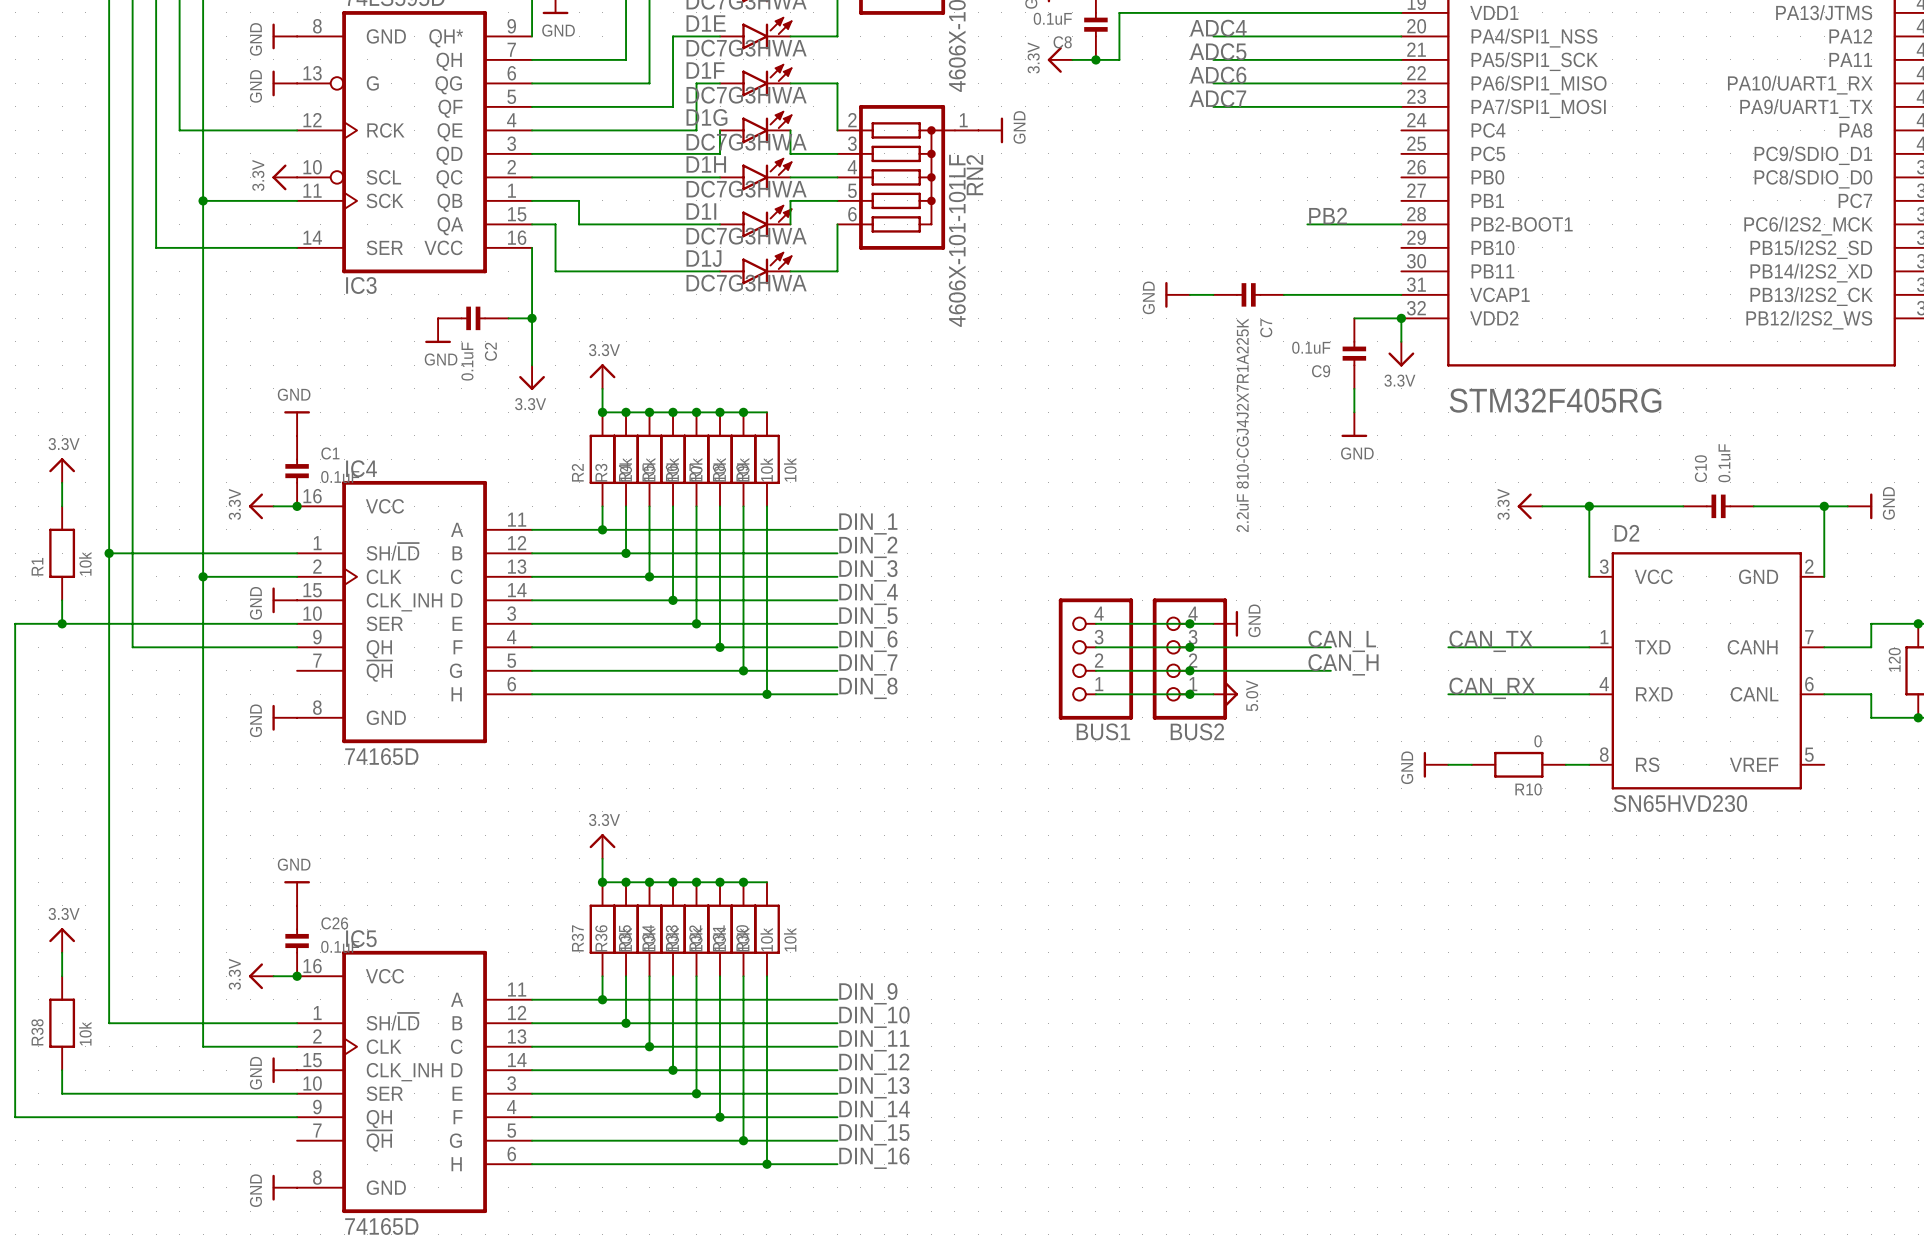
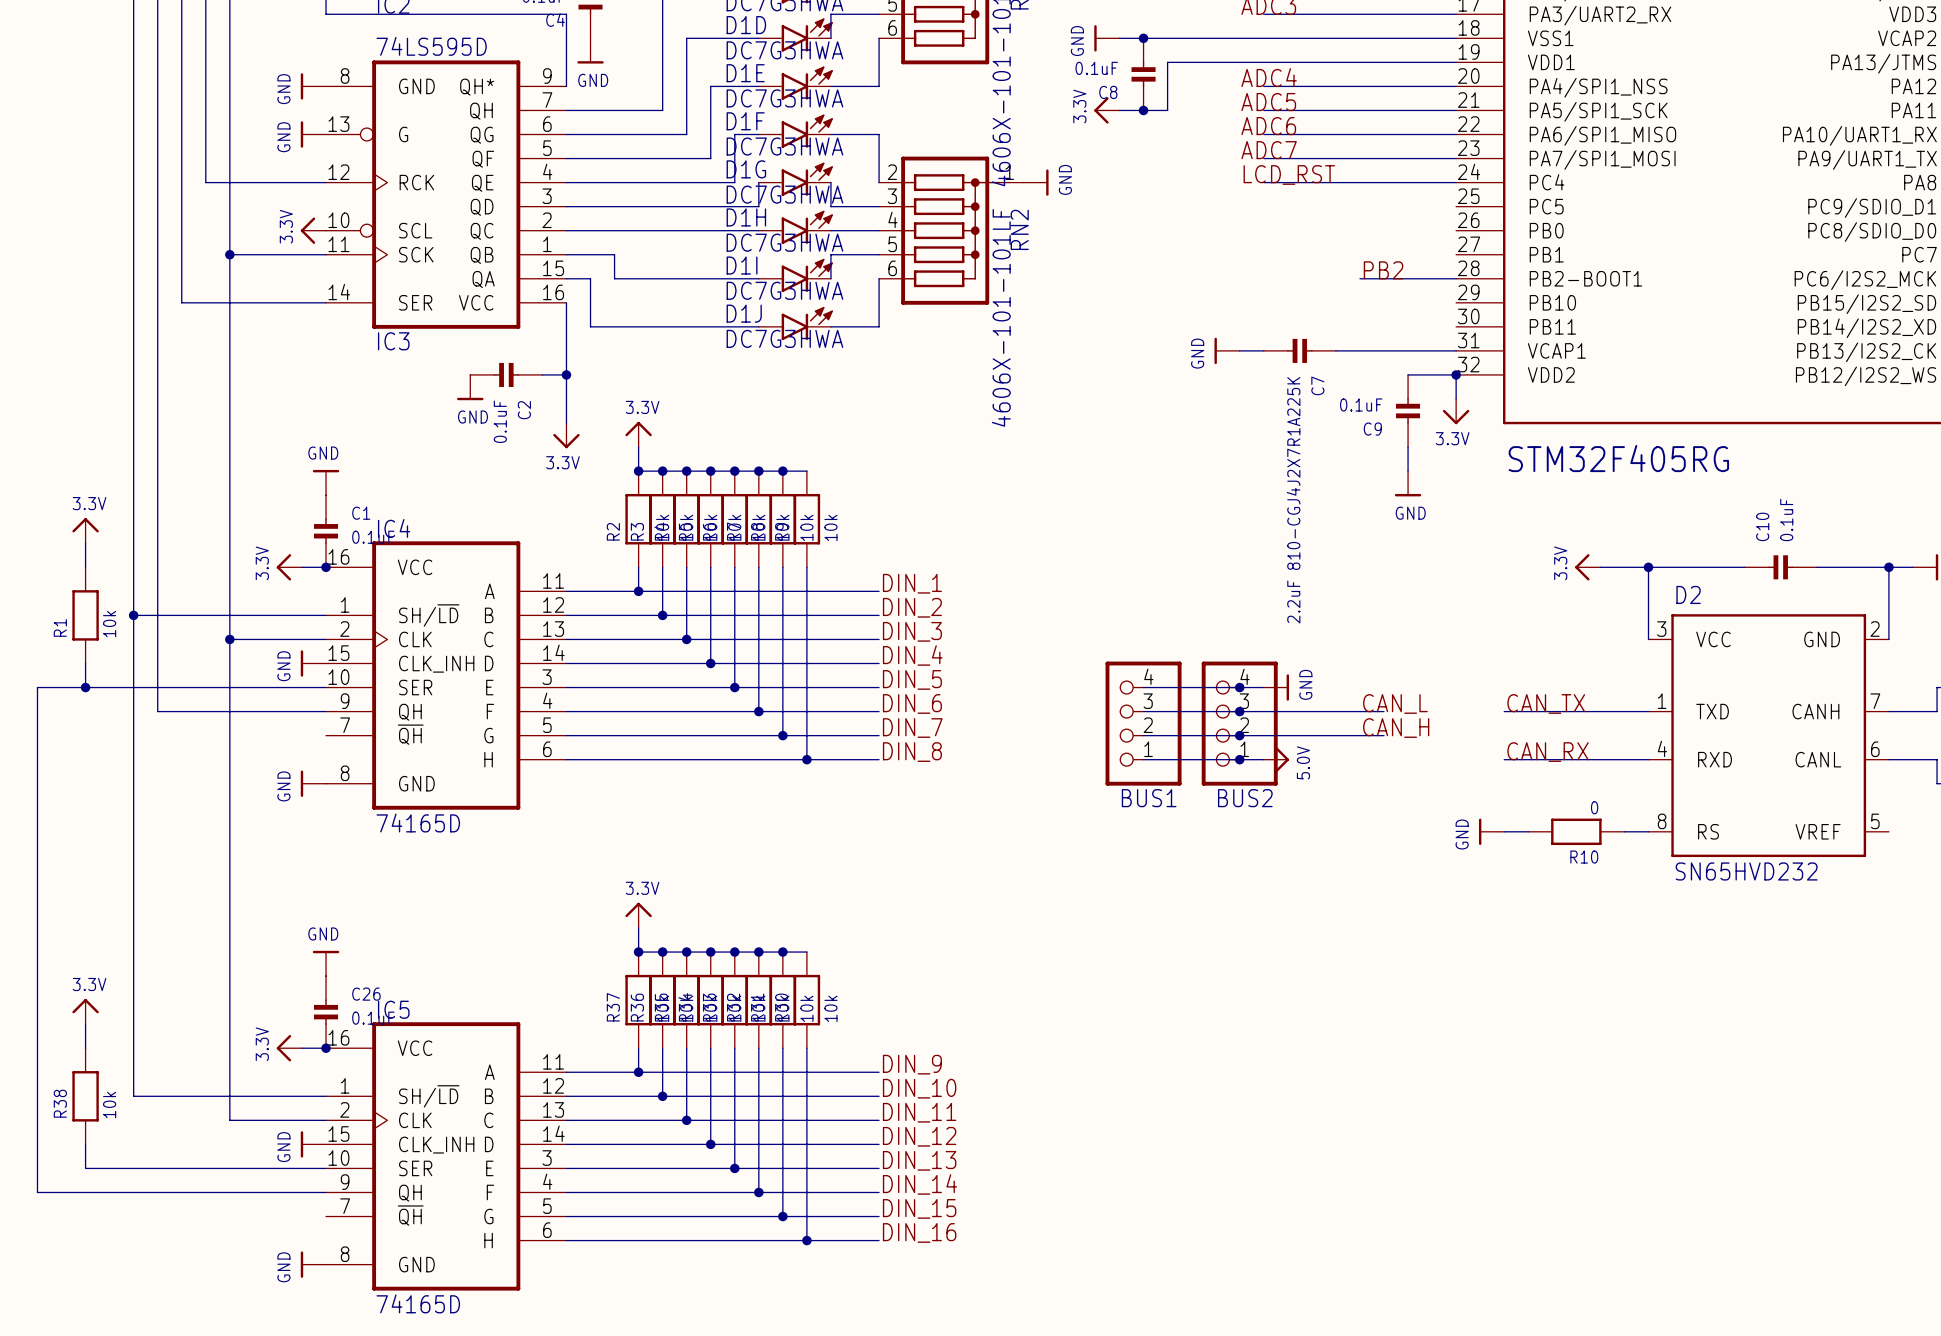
label: none -> LCD_RST (1289, 174)
wire: none -> (1263, 182) (1456, 182)
D2 value: SN65HVD230 (1680, 803) -> SN65HVD232 (1746, 871)

